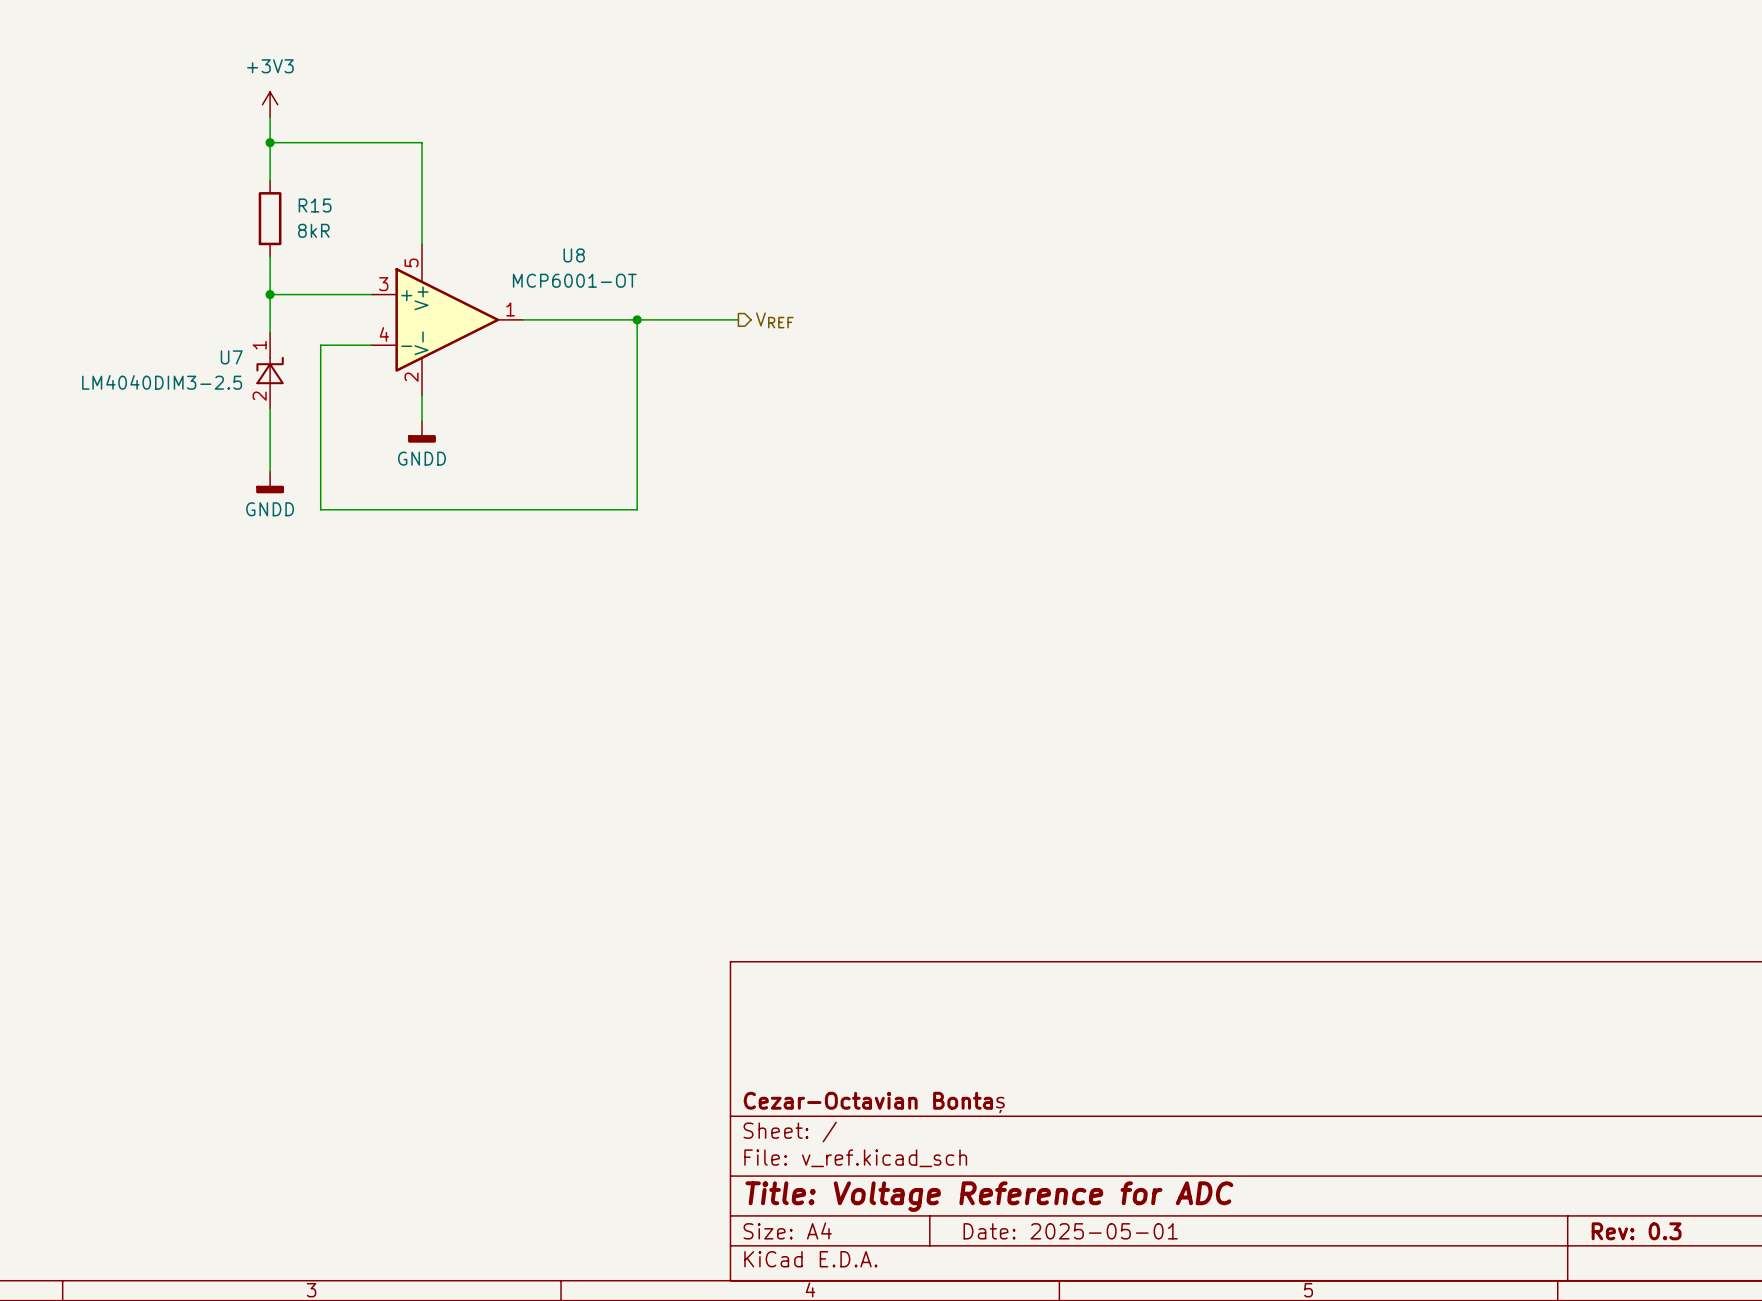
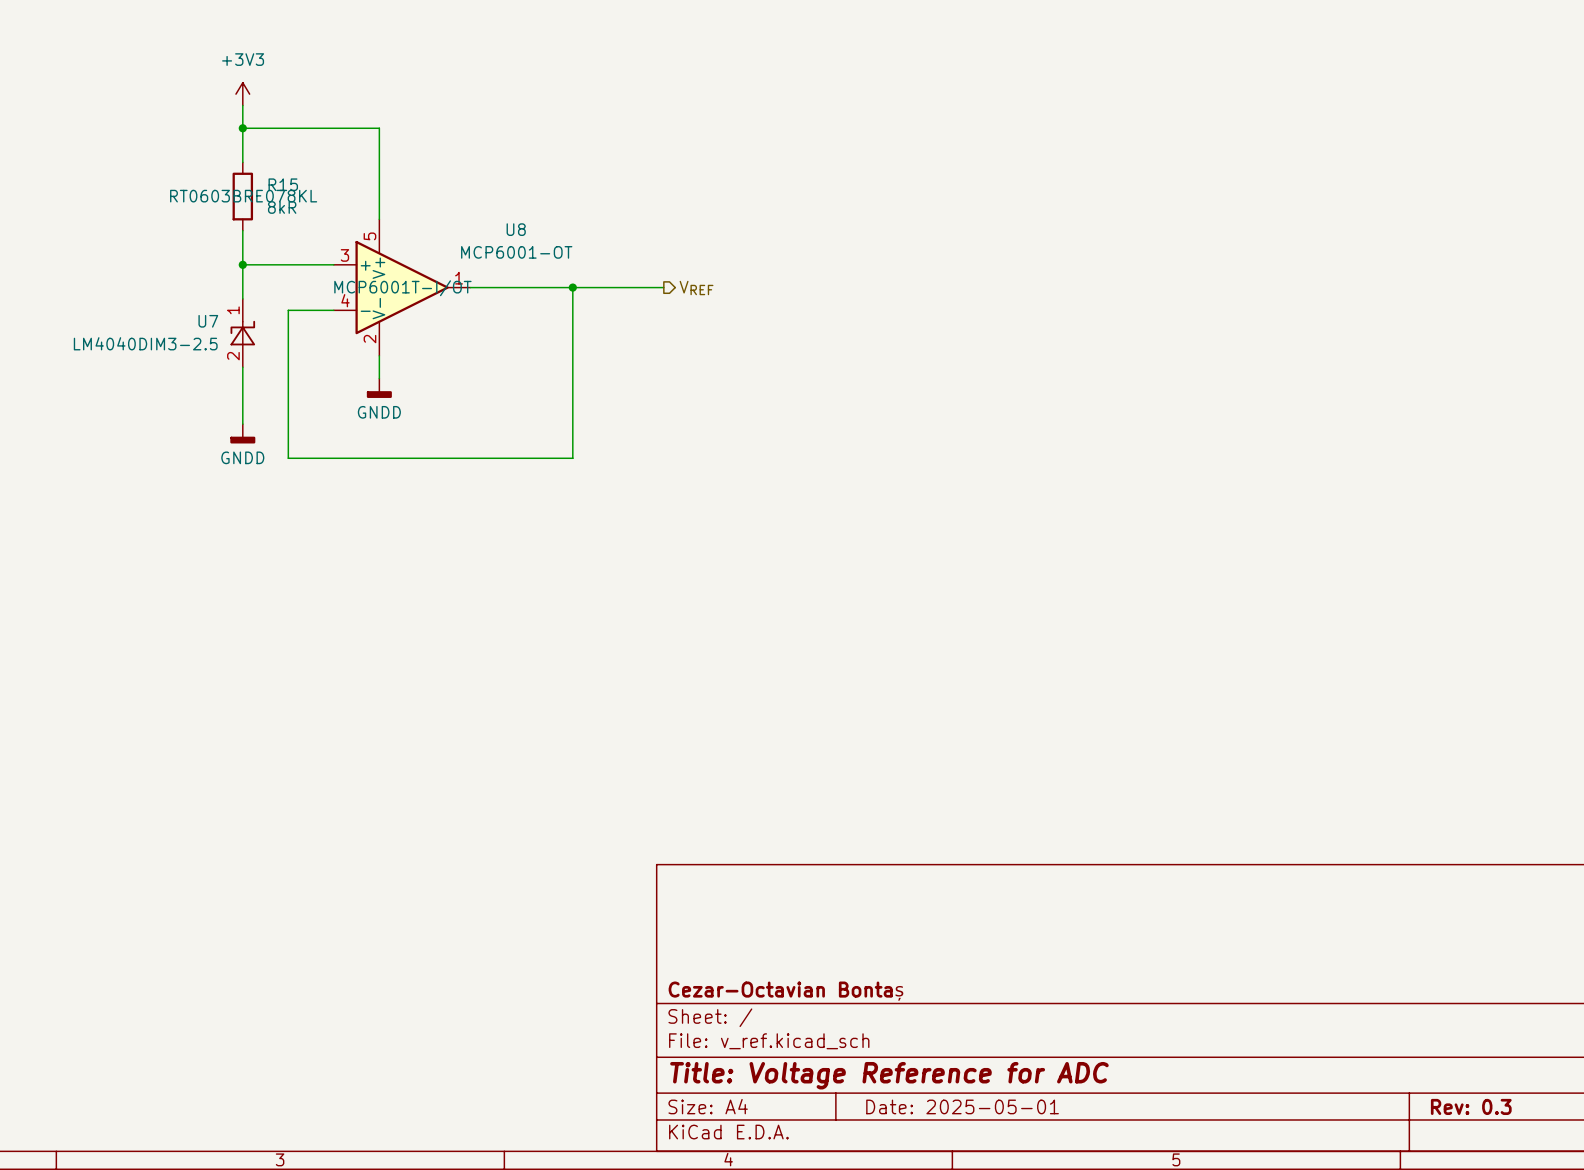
R15 text: none -> RT0603BRE078KL (243, 196)
U8 text: none -> MCP6001T-I/OT (402, 288)

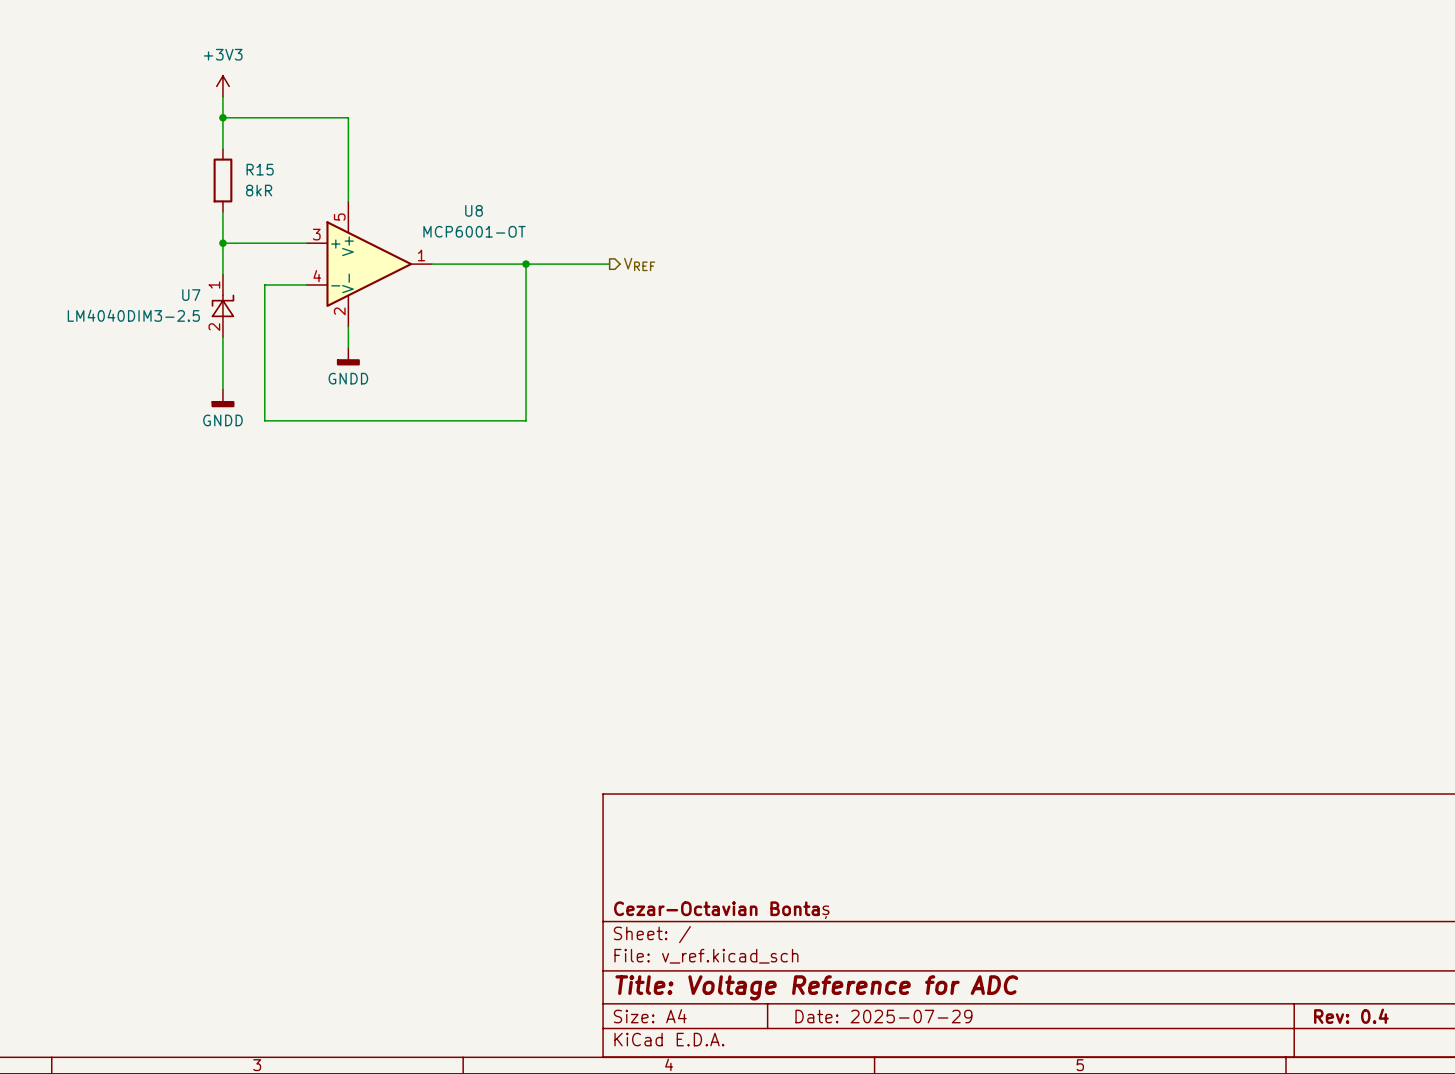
R15 text: RT0603BRE078KL (243, 196) -> none
U8 text: MCP6001T-I/OT (402, 288) -> none
title block: Date: 2025-05-01 (962, 1106) -> Date: 2025-07-29 (883, 1016)
title block: Rev: 0.3 (1471, 1106) -> Rev: 0.4 (1351, 1016)

